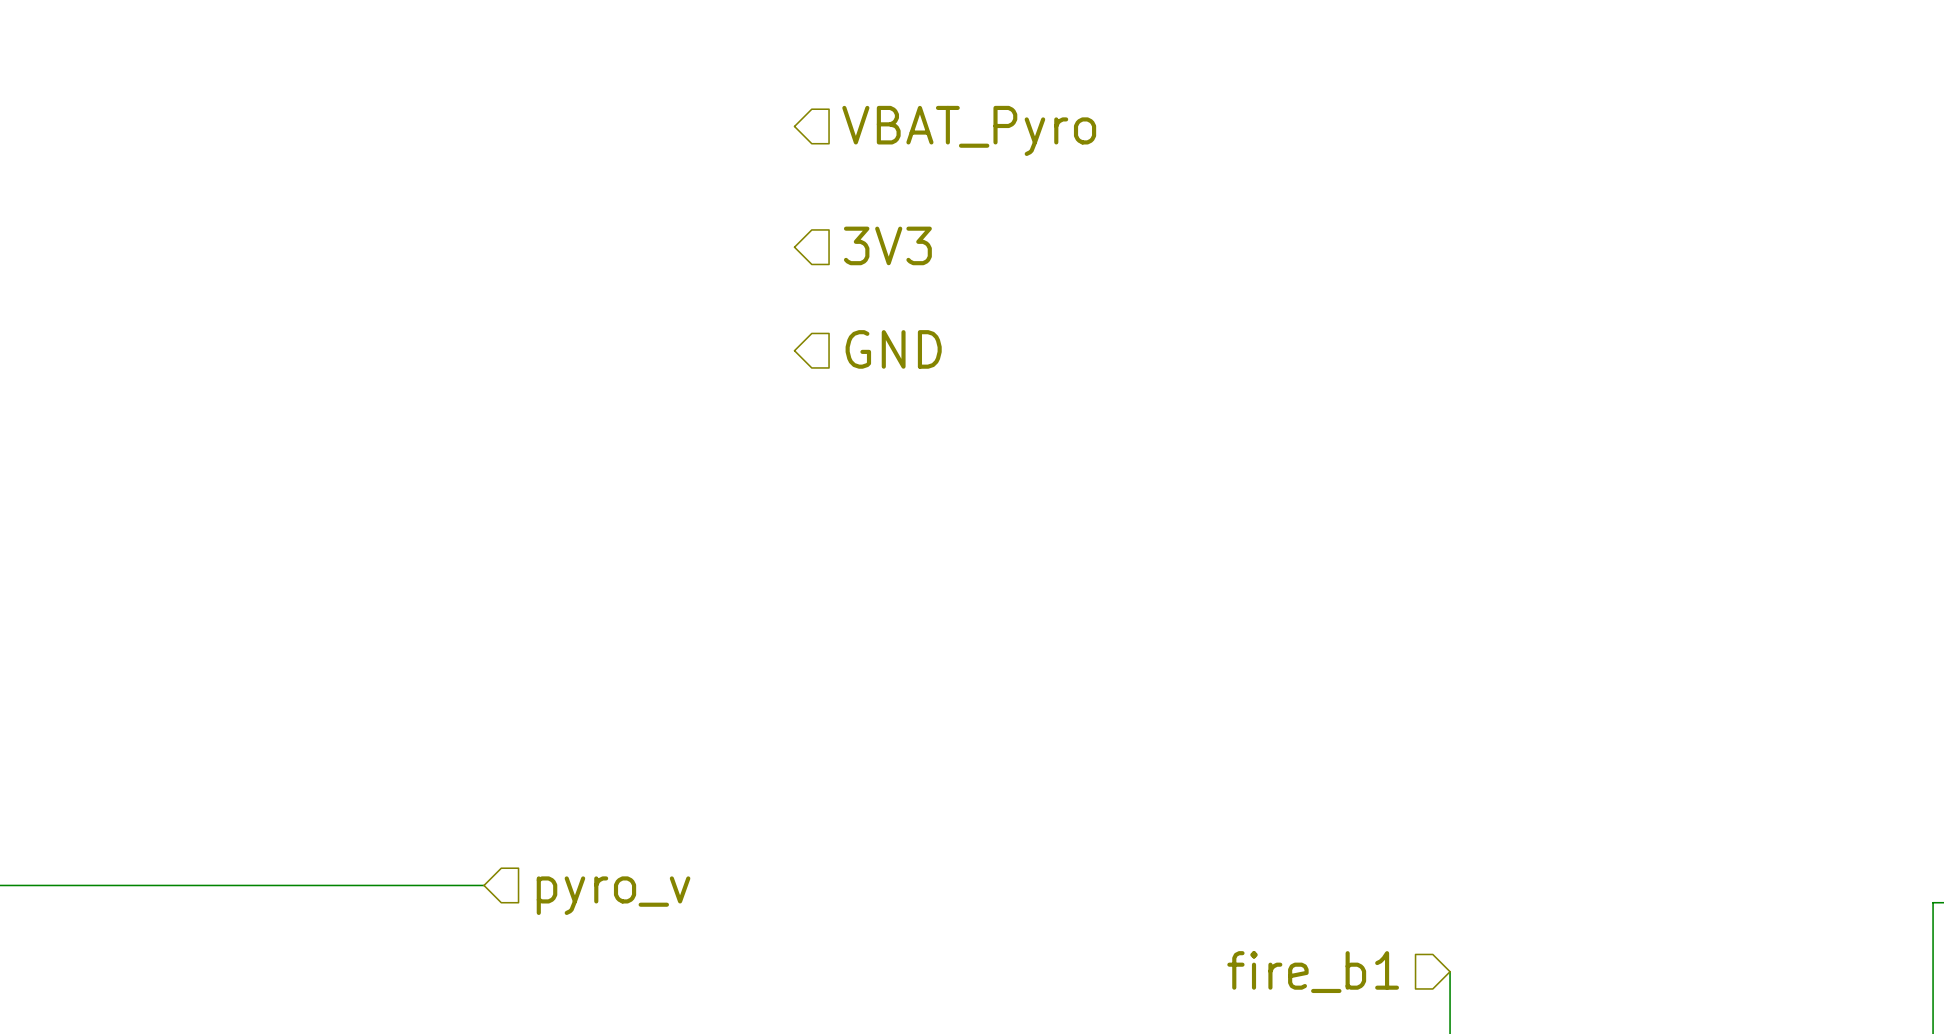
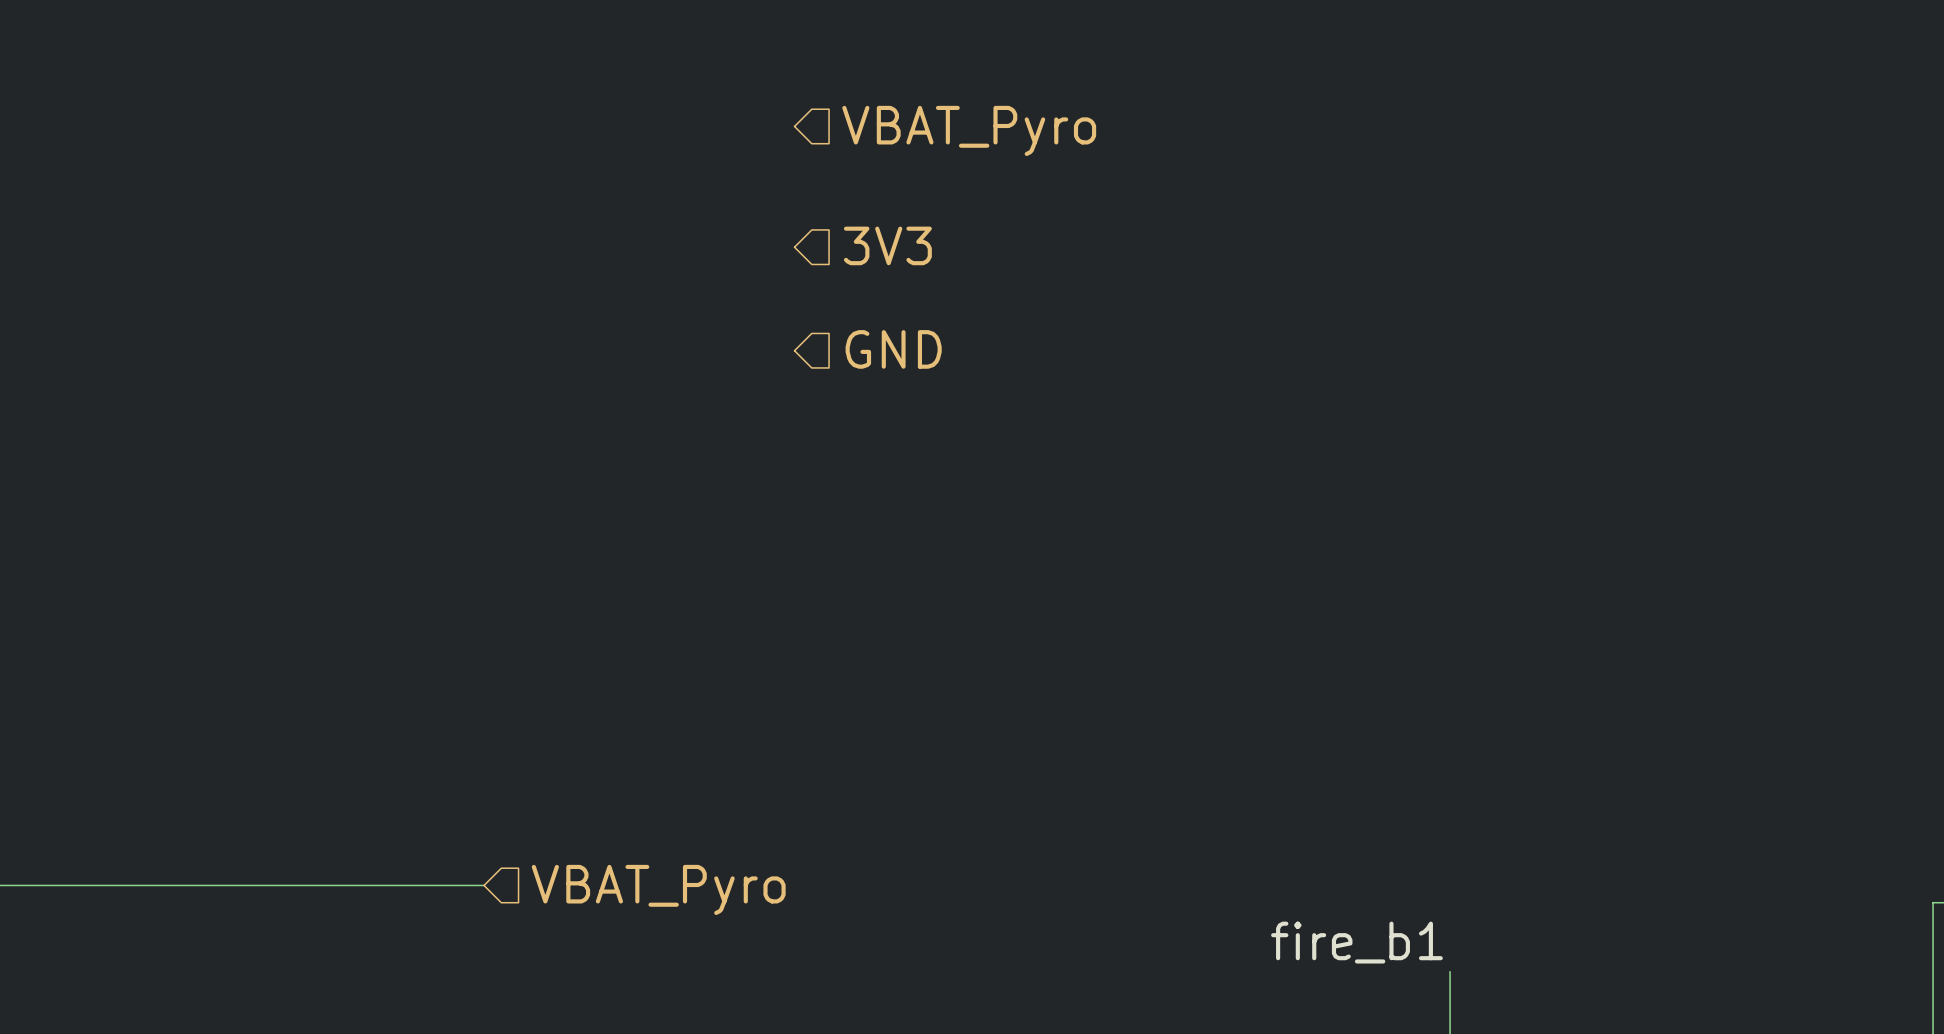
hierarchical label: pyro_v (613, 895) -> VBAT_Pyro (658, 889)
label: none -> fire_b1 (1356, 942)
hierarchical label: fire_b1 (1313, 972) -> none

